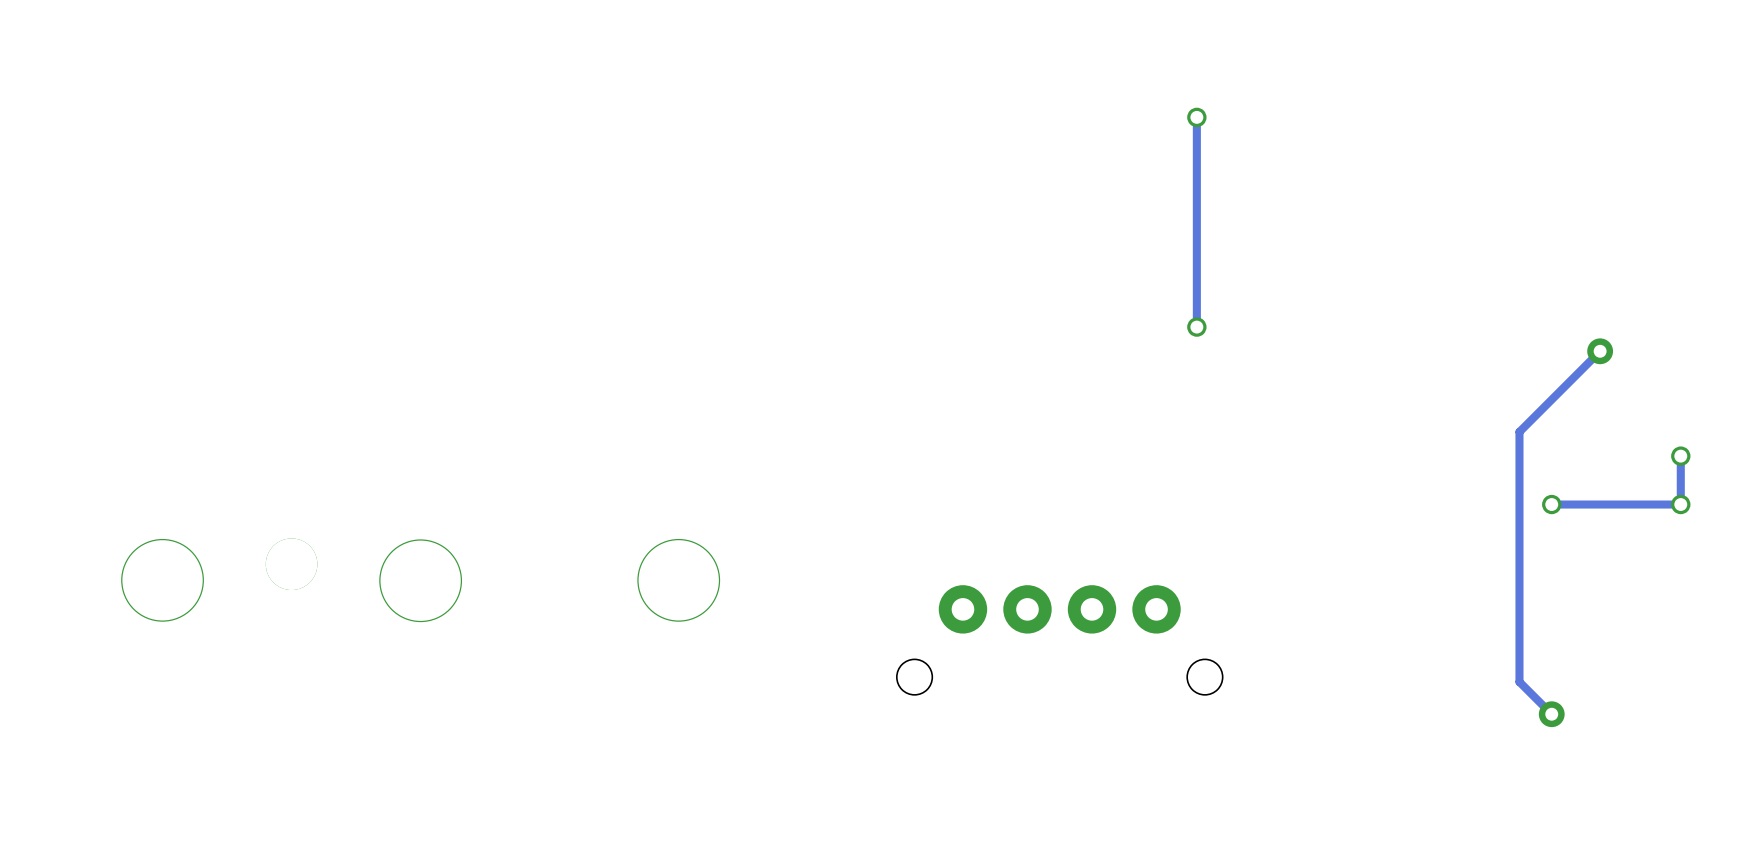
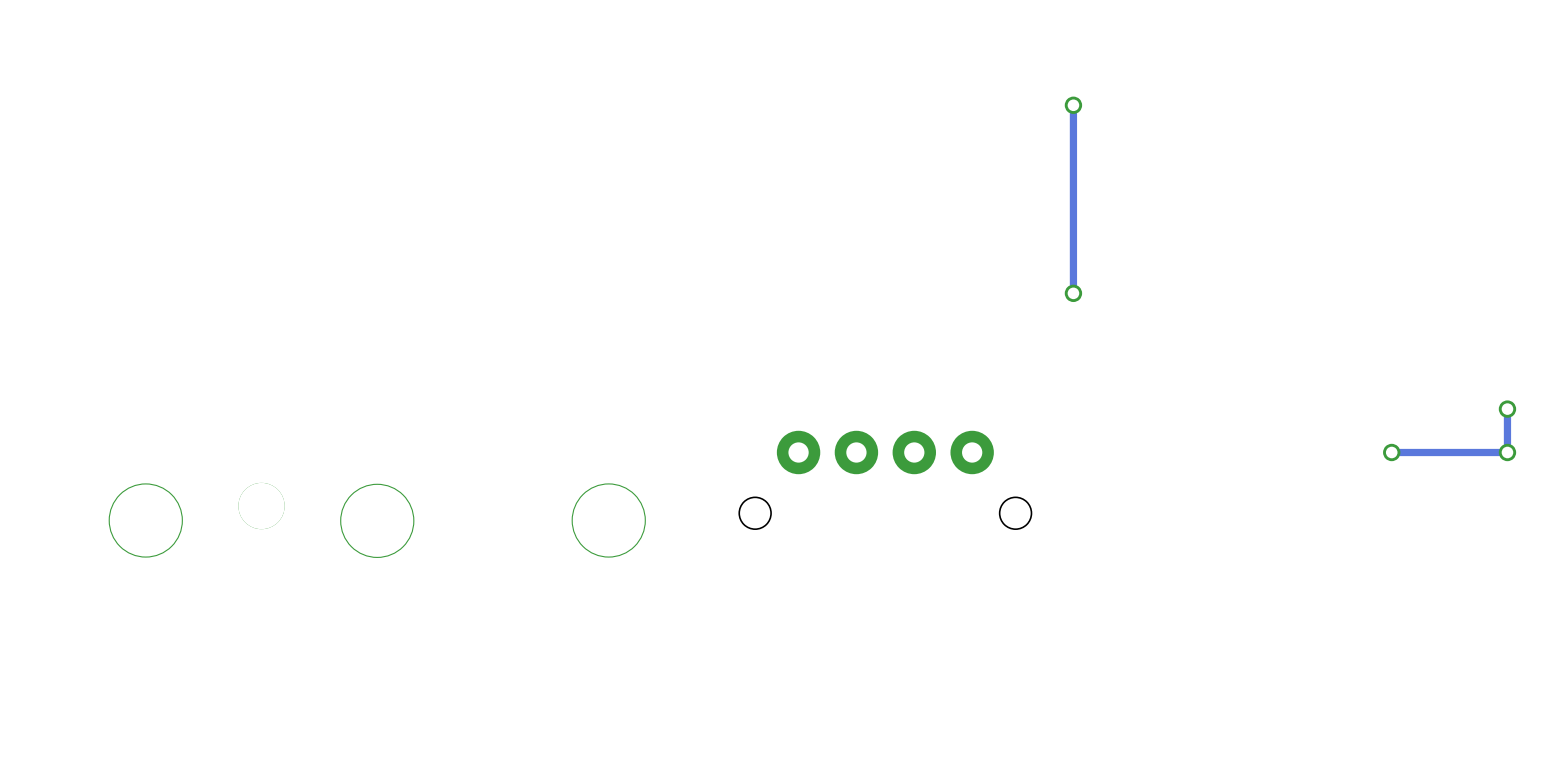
track: (1600, 351) (1519, 431) (1519, 681) (1551, 714) -> none
via: (1600, 351) -> none
part position: (1059, 640) -> (885, 479)
via: (1551, 714) -> none

